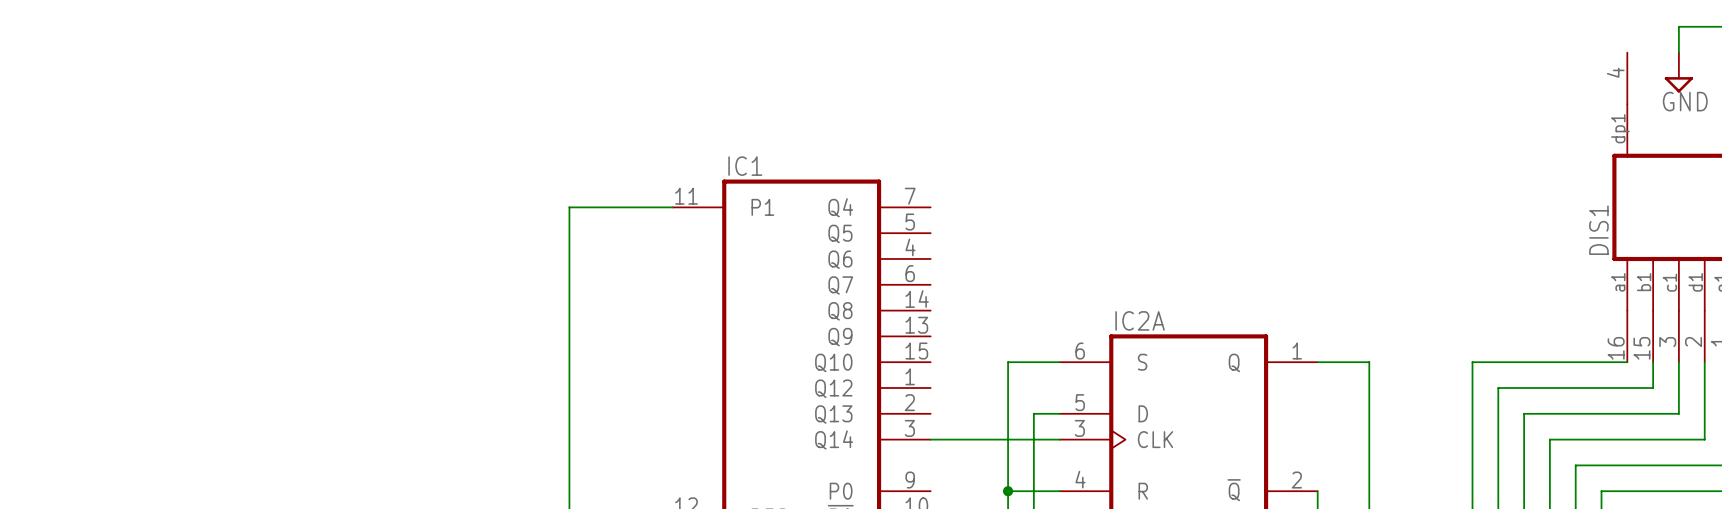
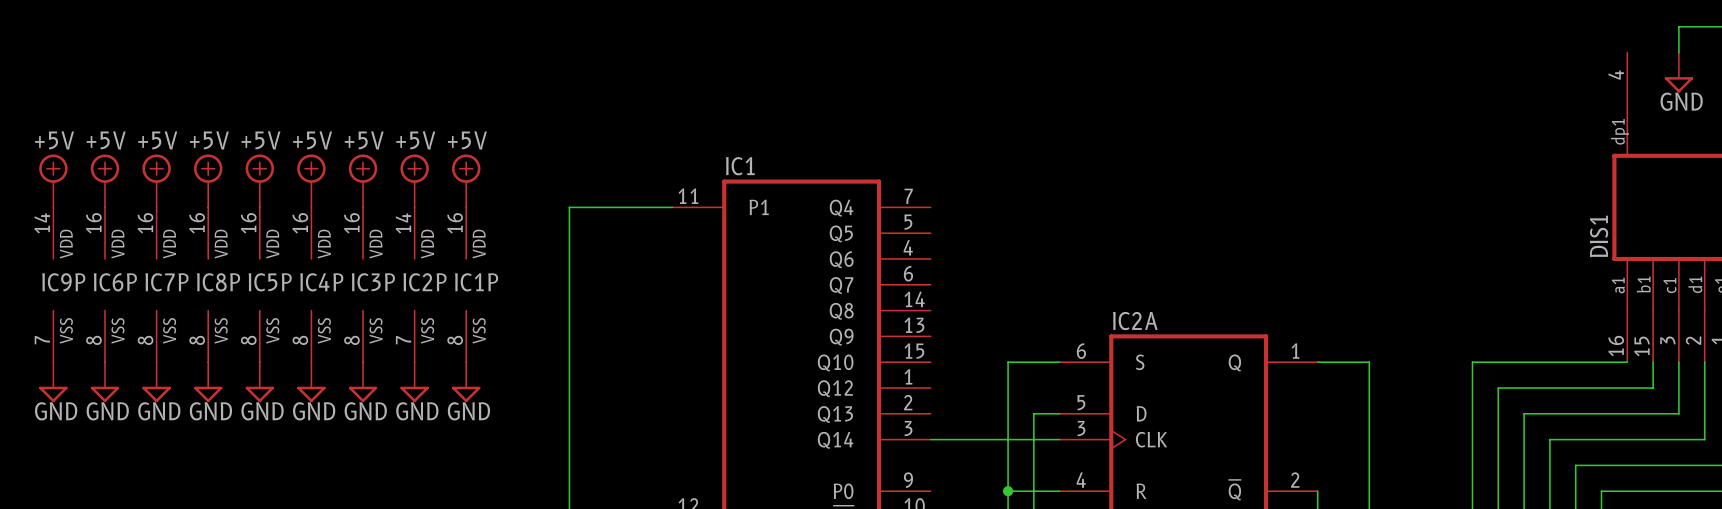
power symbol: none -> +5V (53, 180)
power symbol: none -> +5V (104, 180)
power symbol: none -> +5V (156, 180)
power symbol: none -> +5V (208, 180)
power symbol: none -> +5V (259, 180)
power symbol: none -> +5V (311, 180)
power symbol: none -> +5V (363, 180)
power symbol: none -> +5V (414, 180)
power symbol: none -> +5V (466, 180)
IC9P: none -> (53, 284)
IC6P: none -> (104, 284)
IC7P: none -> (156, 284)
IC8P: none -> (208, 284)
IC5P: none -> (259, 284)
IC4P: none -> (311, 284)
IC3P: none -> (363, 284)
IC2P: none -> (414, 284)
IC1P: none -> (466, 284)
power symbol: none -> GND (53, 382)
power symbol: none -> GND (104, 382)
power symbol: none -> GND (156, 382)
power symbol: none -> GND (208, 382)
power symbol: none -> GND (259, 382)
power symbol: none -> GND (311, 382)
power symbol: none -> GND (363, 382)
power symbol: none -> GND (414, 382)
power symbol: none -> GND (466, 382)

